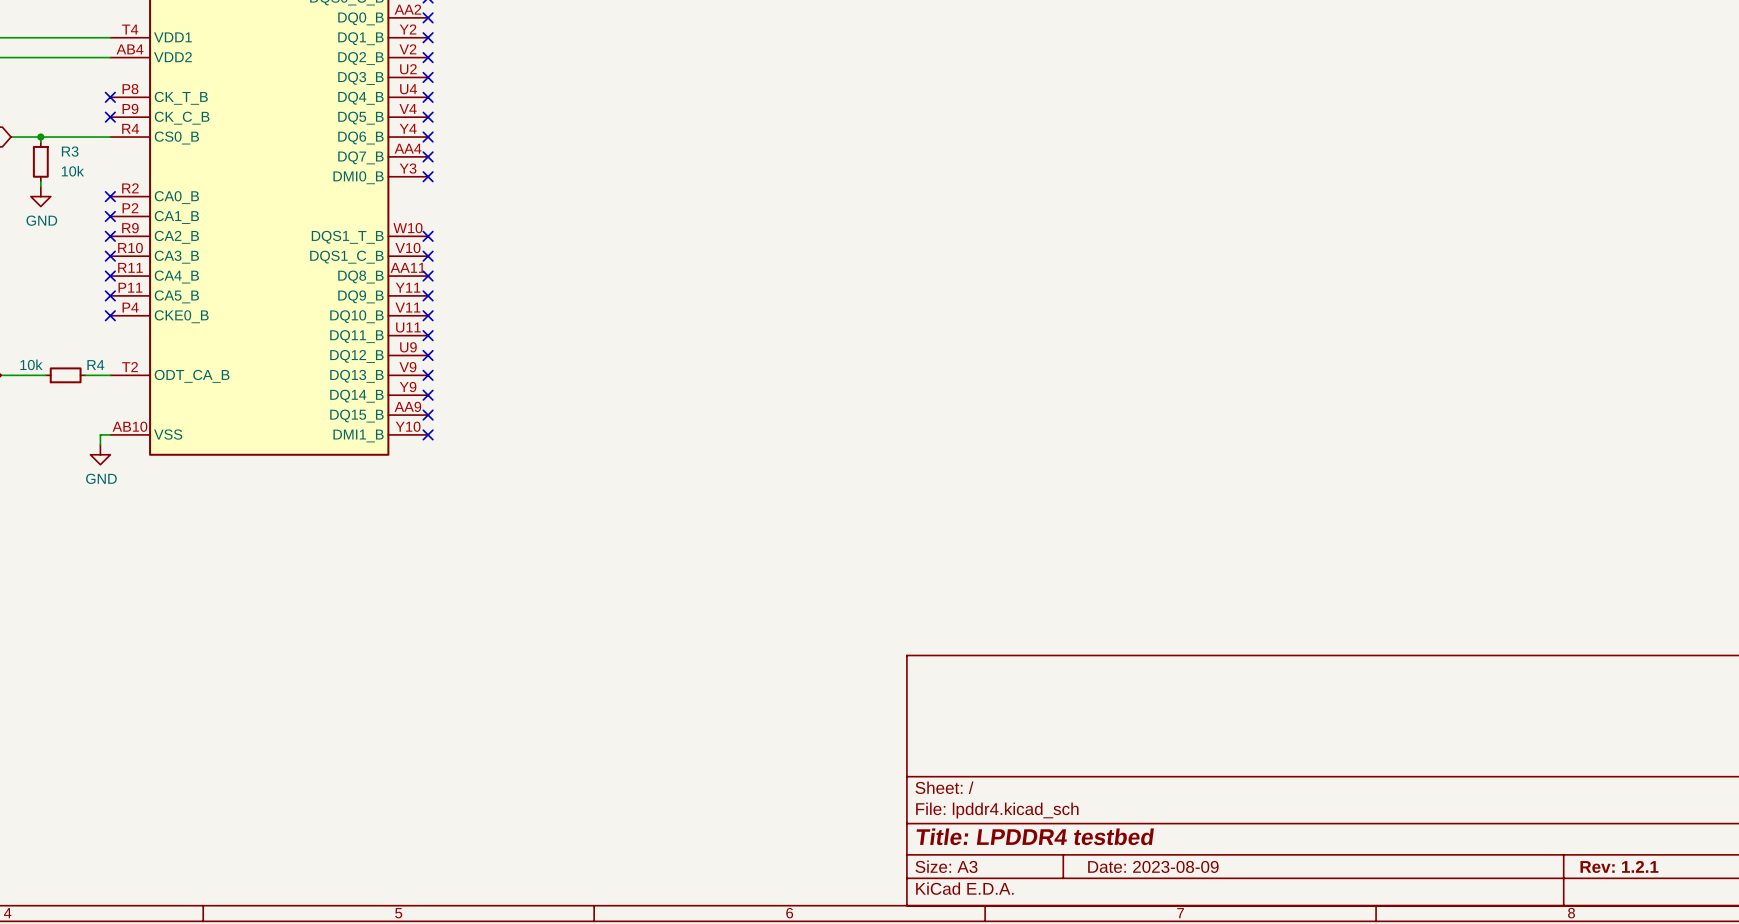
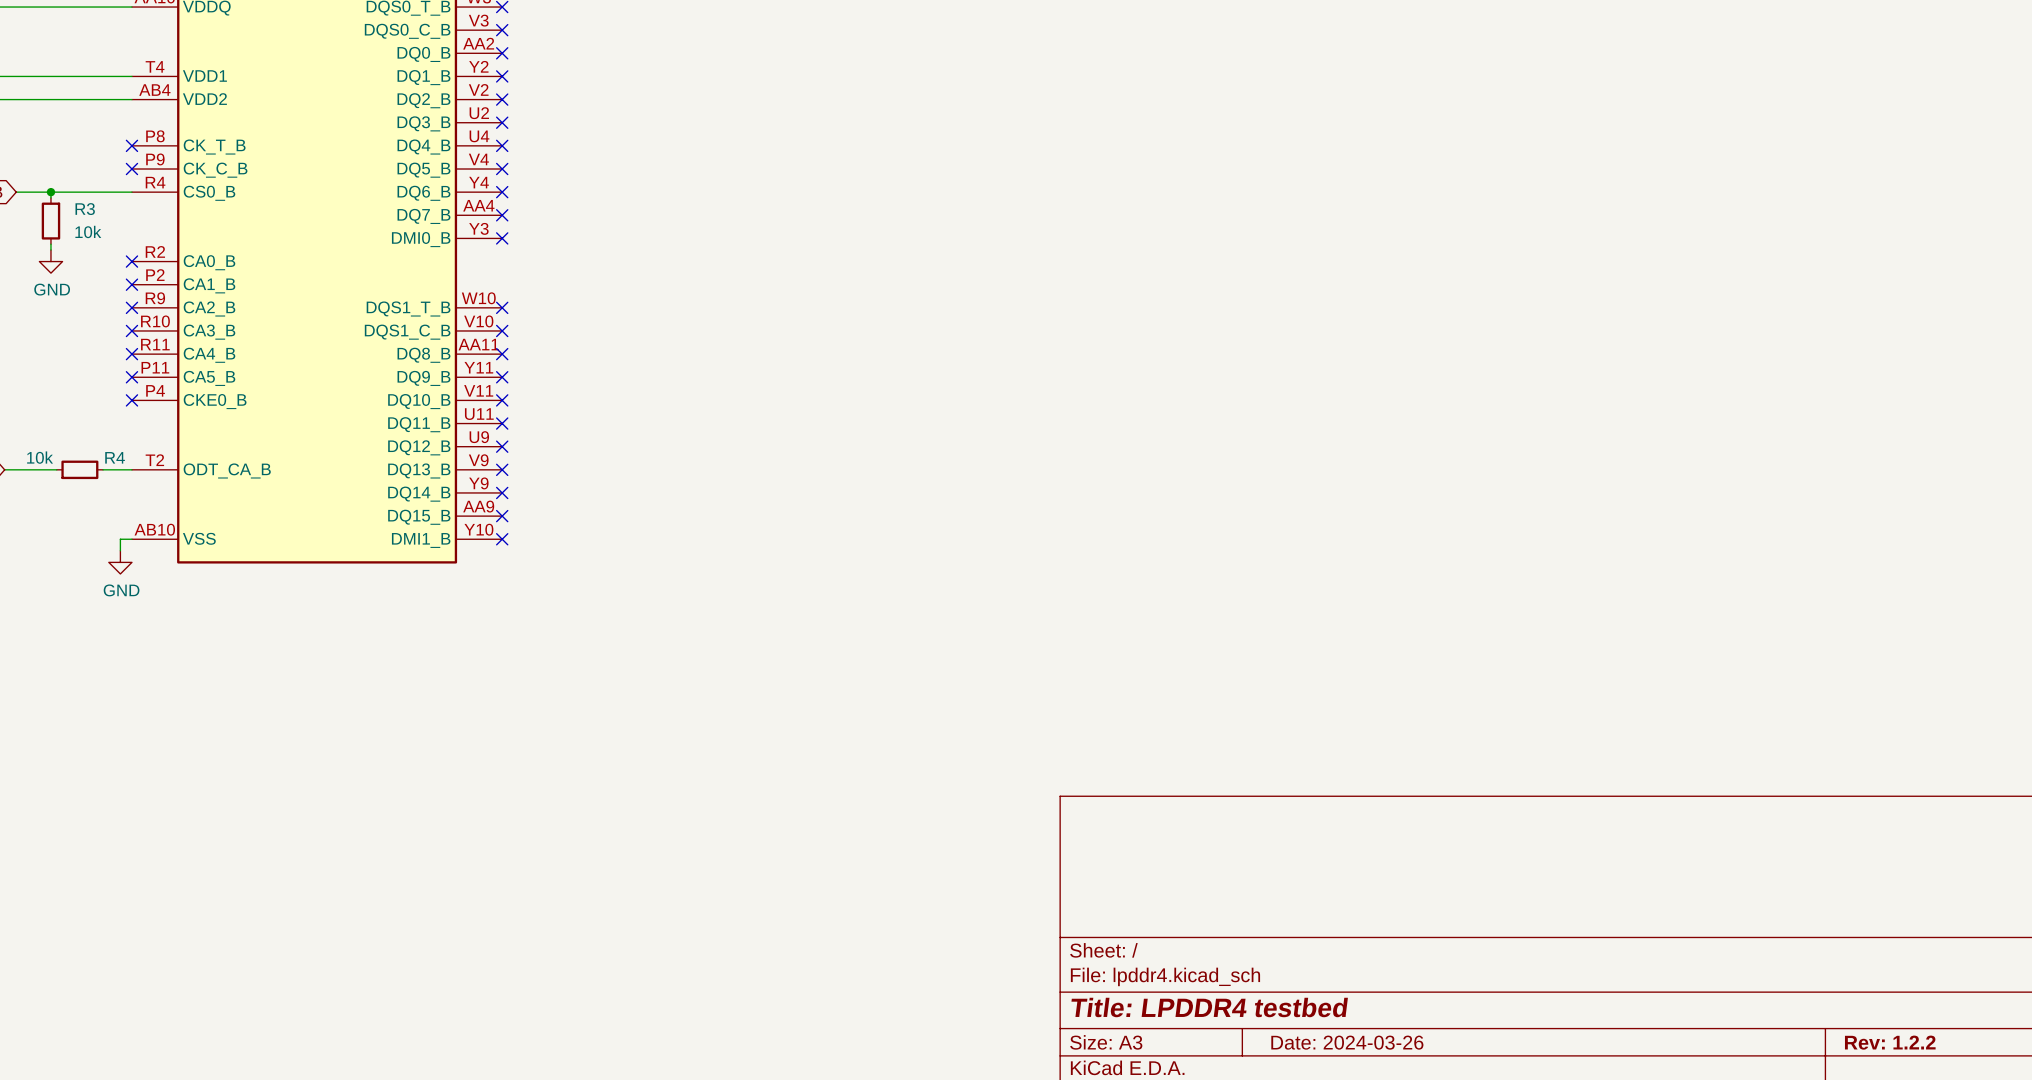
title block: Date: 2023-08-09 (1153, 866) -> Date: 2024-03-26 (1347, 1042)
title block: Rev: 1.2.1 (1619, 866) -> Rev: 1.2.2 (1890, 1042)

